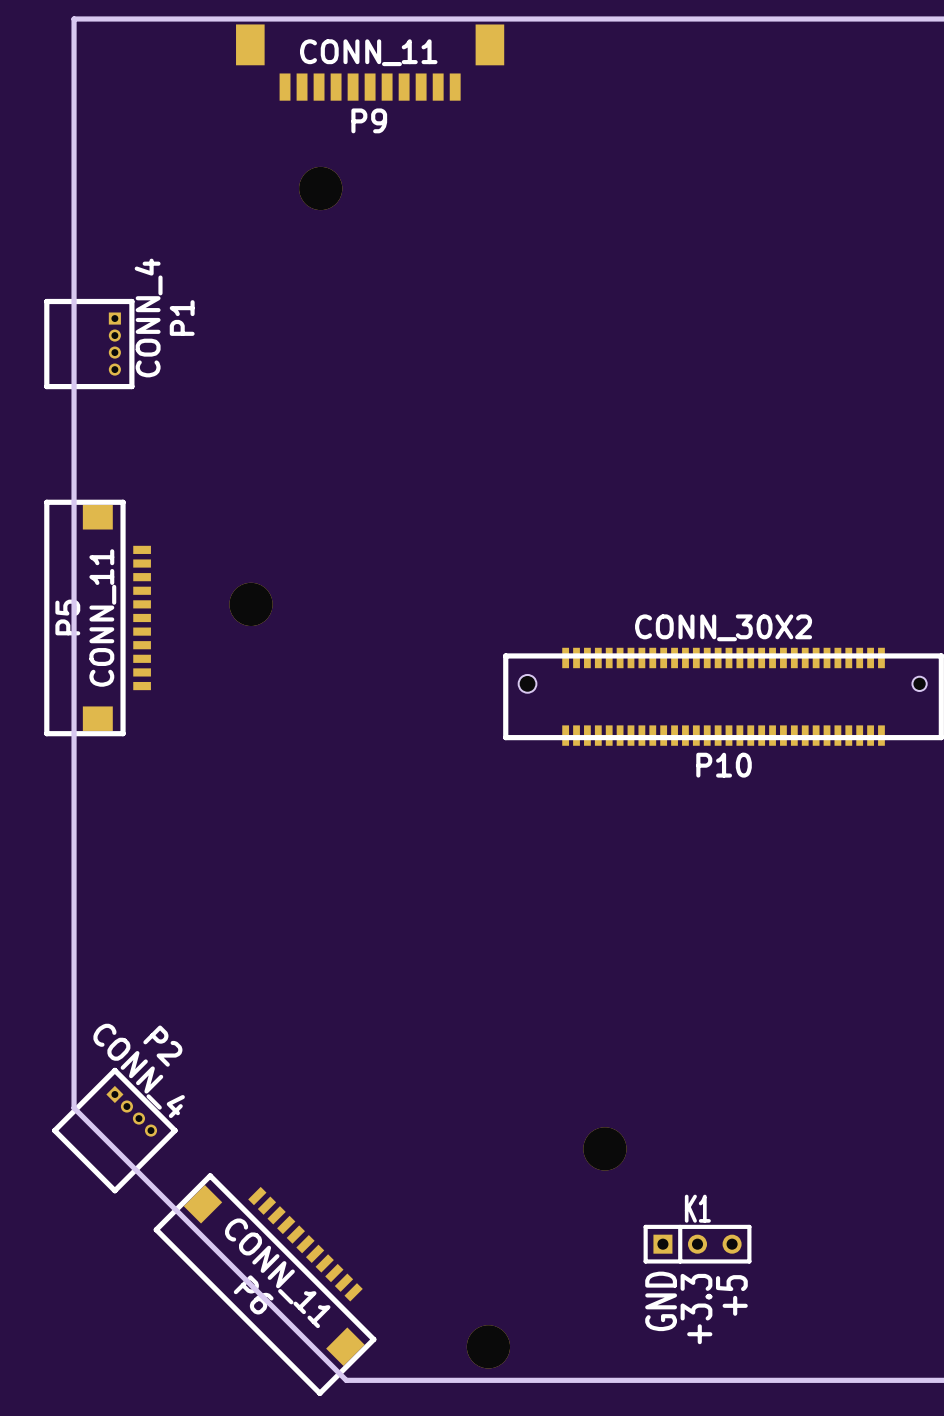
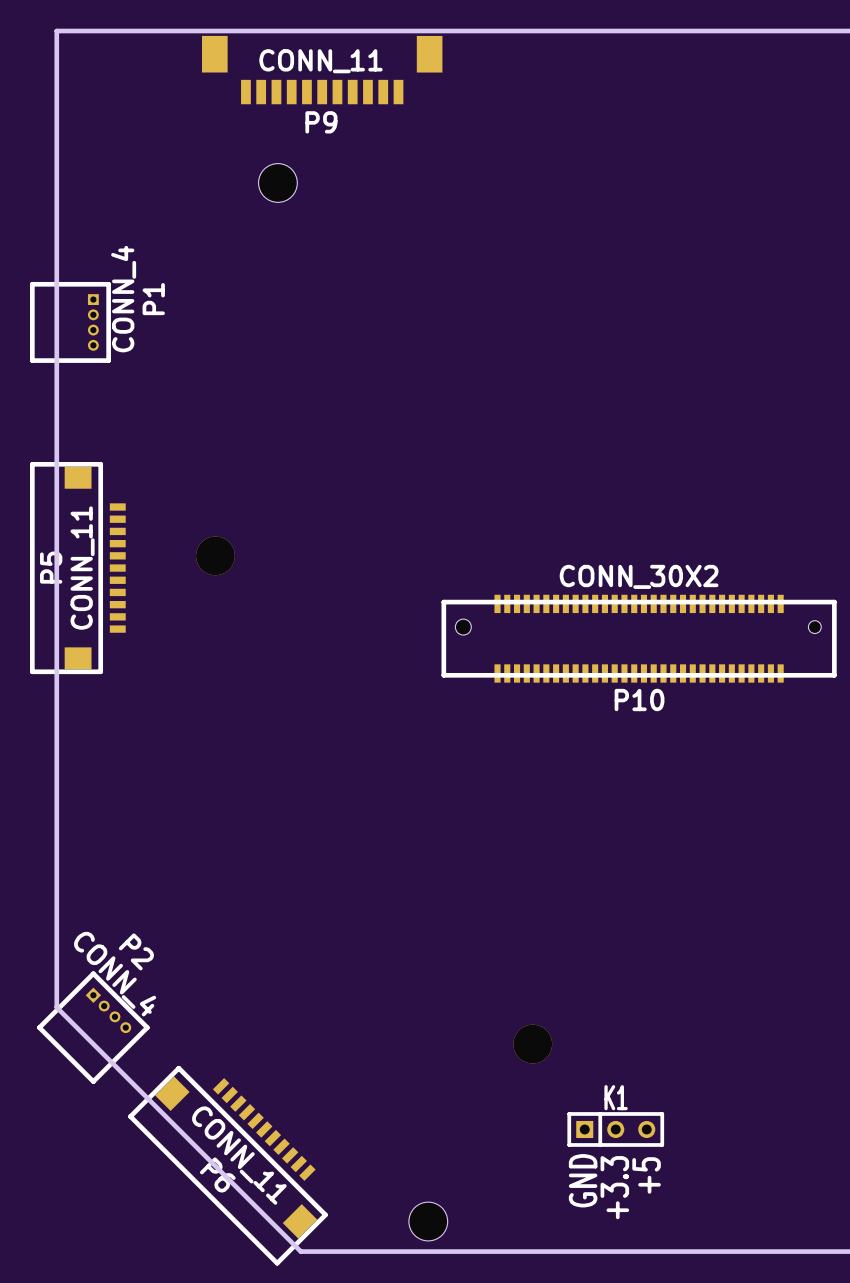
part footprint: [299, 166, 343, 211] -> [258, 163, 298, 203]
part footprint: [466, 1325, 511, 1369] -> [408, 1202, 448, 1241]

